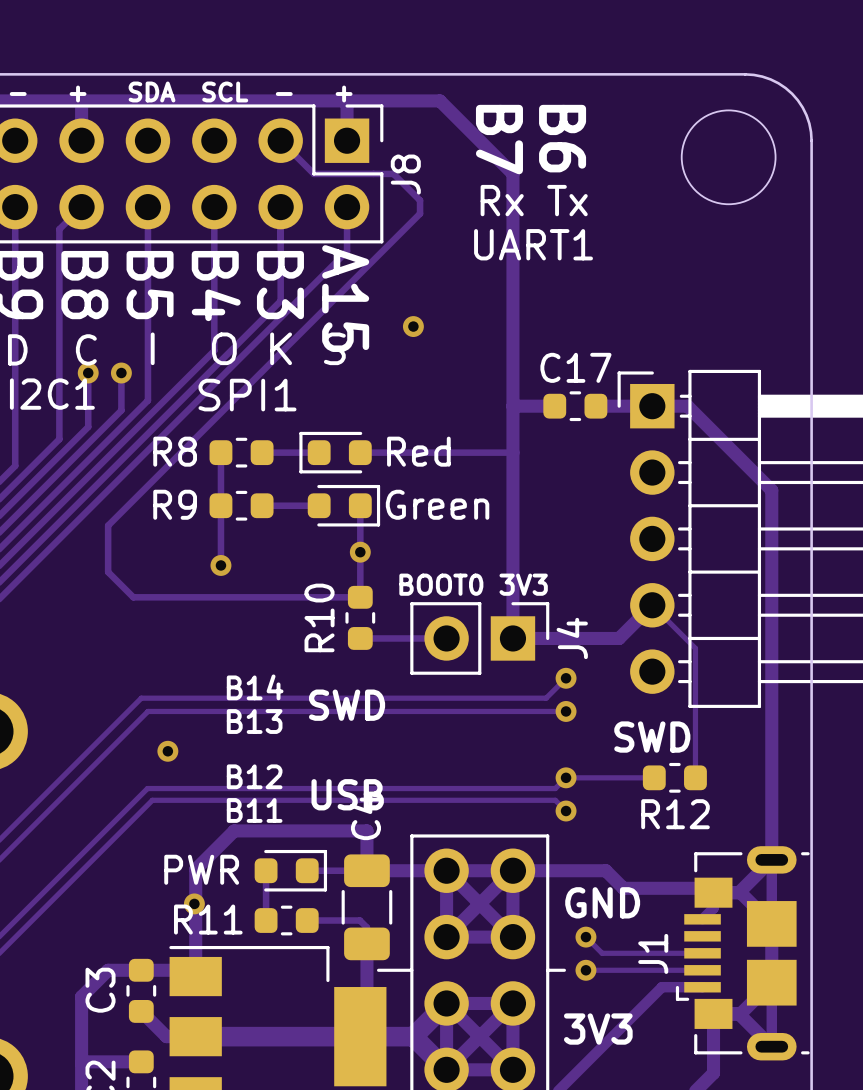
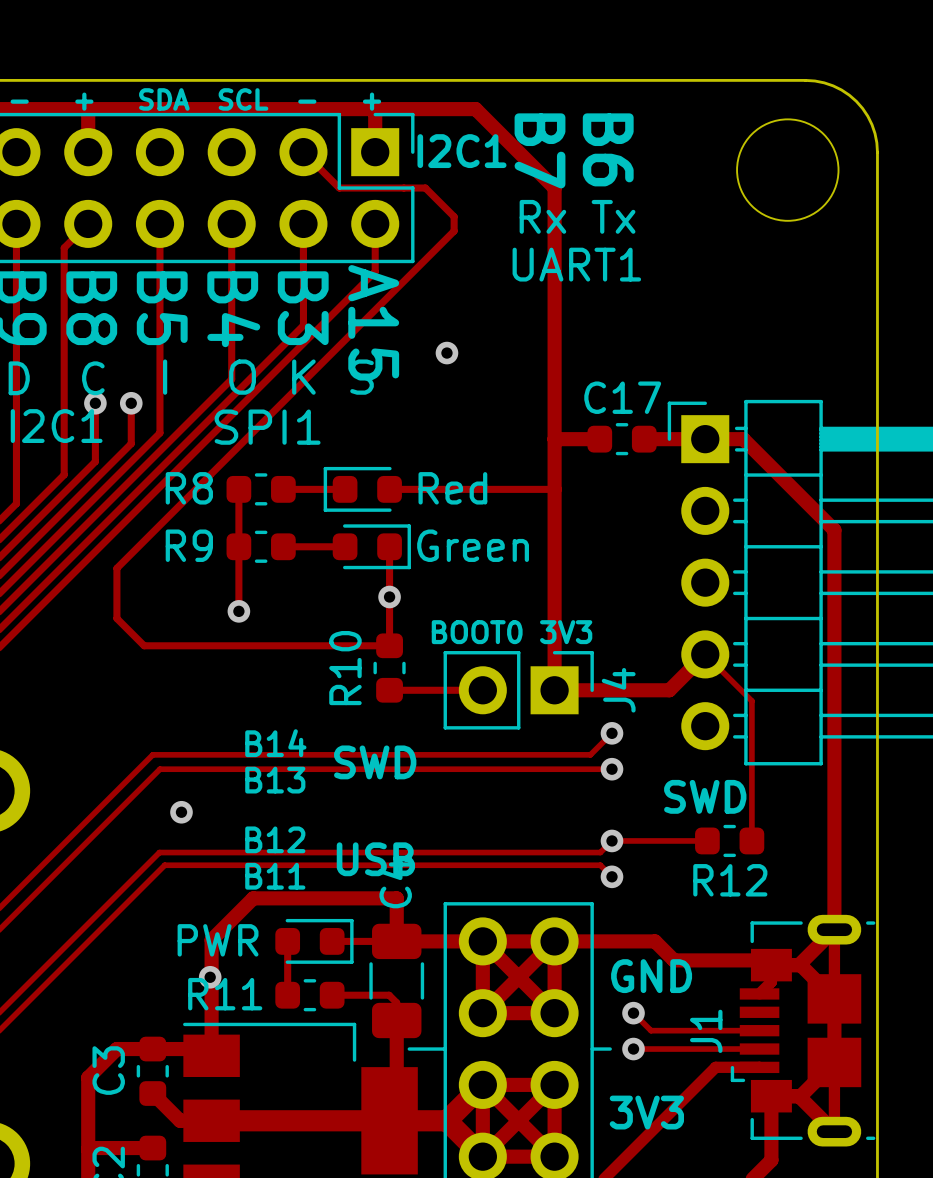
text: none -> I2C1 (461, 151)
J8 name: J8 (405, 174) -> none

